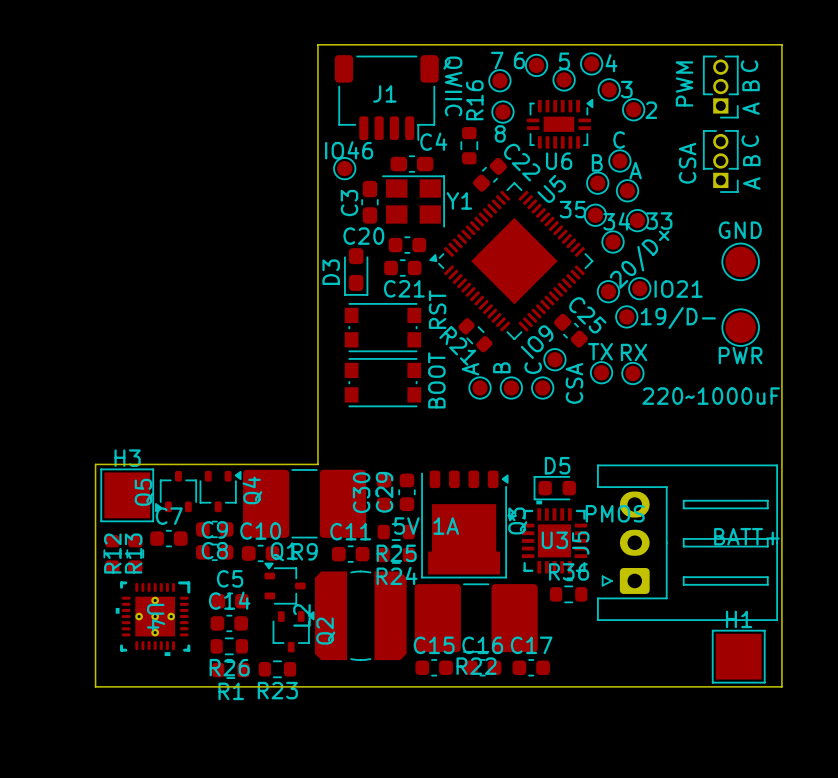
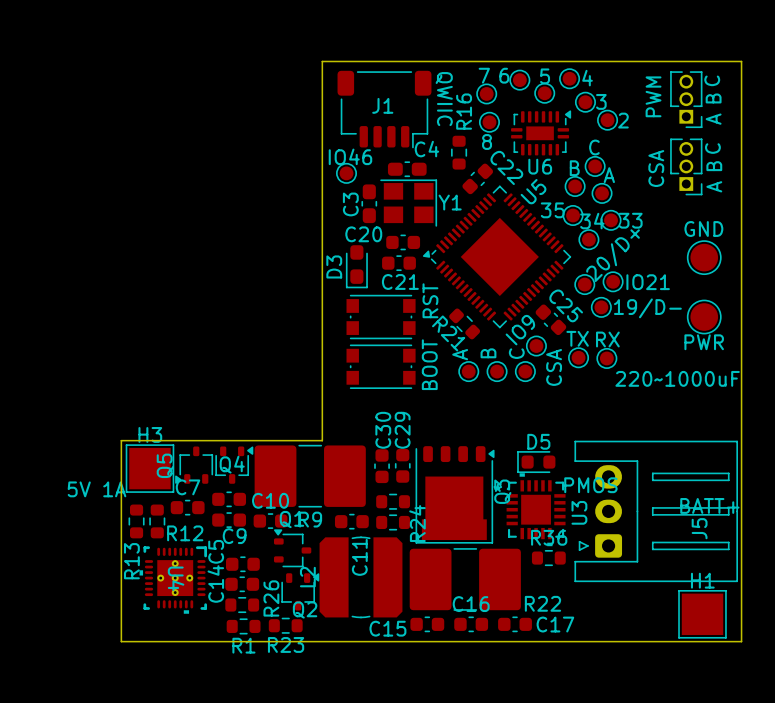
Q4 name rotation: 0° (252, 490) -> 90° clockwise (232, 464)
C30 name position: C30 (361, 492) -> C30 (383, 430)
C29 name position: C29 (384, 492) -> C29 (402, 430)
text position: 5V 1A (426, 526) -> 5V 1A (97, 489)
C9 name position: C9 (214, 529) -> C9 (234, 536)
C11 name rotation: 0° (350, 531) -> 90° counterclockwise (359, 557)
C11 name position: C11 (350, 531) -> C11 (359, 557)
U3 name rotation: 0° (554, 540) -> 90° counterclockwise (579, 512)
U3 name position: U3 (554, 540) -> U3 (579, 512)
J5 name position: J5 (580, 543) -> J5 (699, 528)
C8 name: C8 (214, 550) -> none
R12 name rotation: 0° (112, 553) -> 90° clockwise (185, 533)
R12 name position: R12 (112, 553) -> R12 (185, 533)
R13 name position: R13 (133, 553) -> R13 (131, 561)
R25 name: R25 (396, 553) -> none
R24 name rotation: 0° (397, 575) -> 90° counterclockwise (417, 523)
C5 name rotation: 0° (230, 578) -> 90° counterclockwise (216, 551)
C14 name rotation: 0° (229, 600) -> 90° counterclockwise (215, 583)
Q2 name rotation: 0° (325, 631) -> 90° clockwise (305, 609)
C15 name position: C15 (434, 645) -> C15 (387, 628)
C17 name position: C17 (531, 645) -> C17 (555, 624)
R22 name position: R22 (476, 666) -> R22 (542, 603)
R26 name rotation: 0° (229, 667) -> 90° counterclockwise (271, 598)

